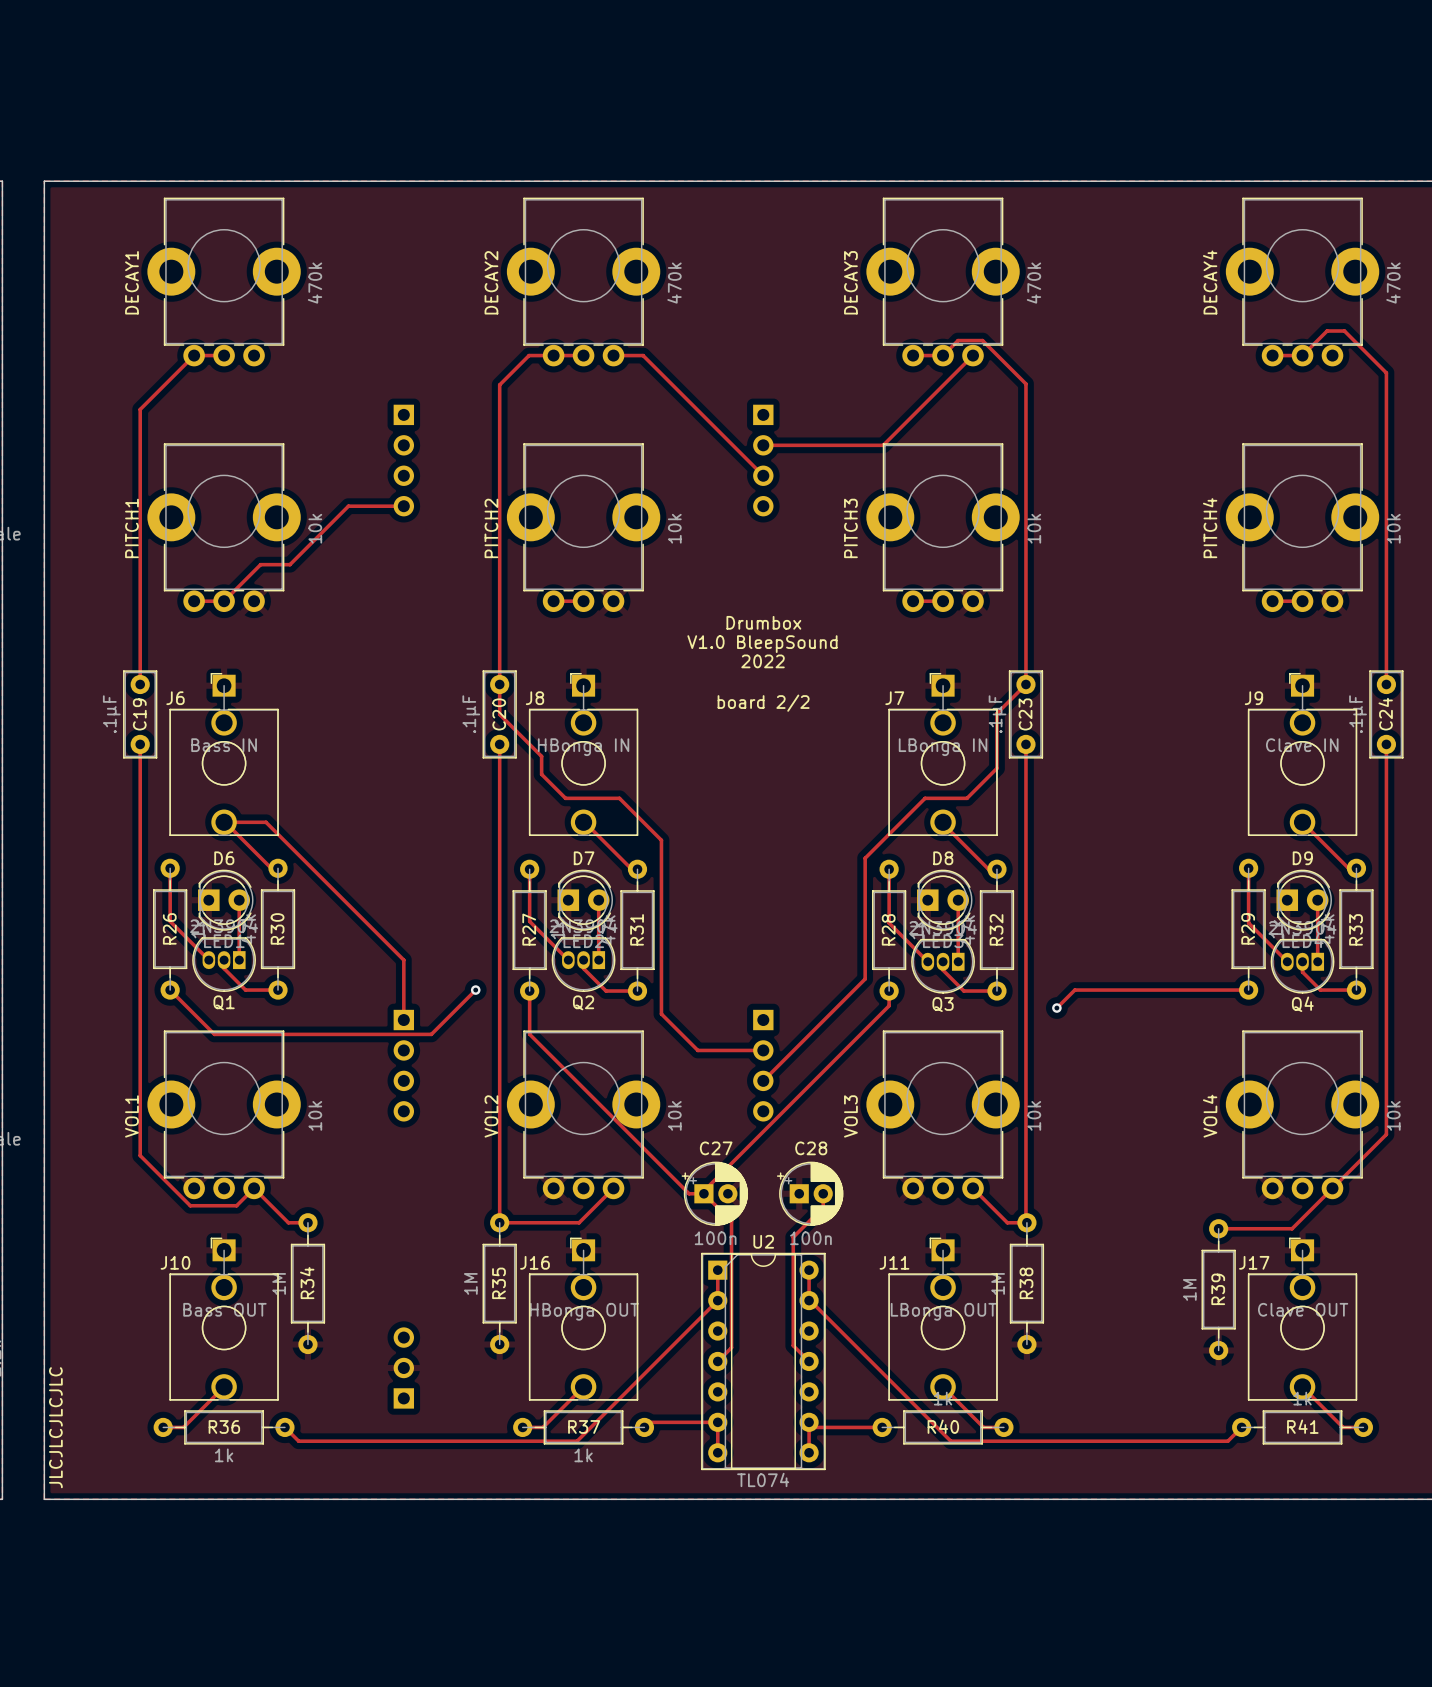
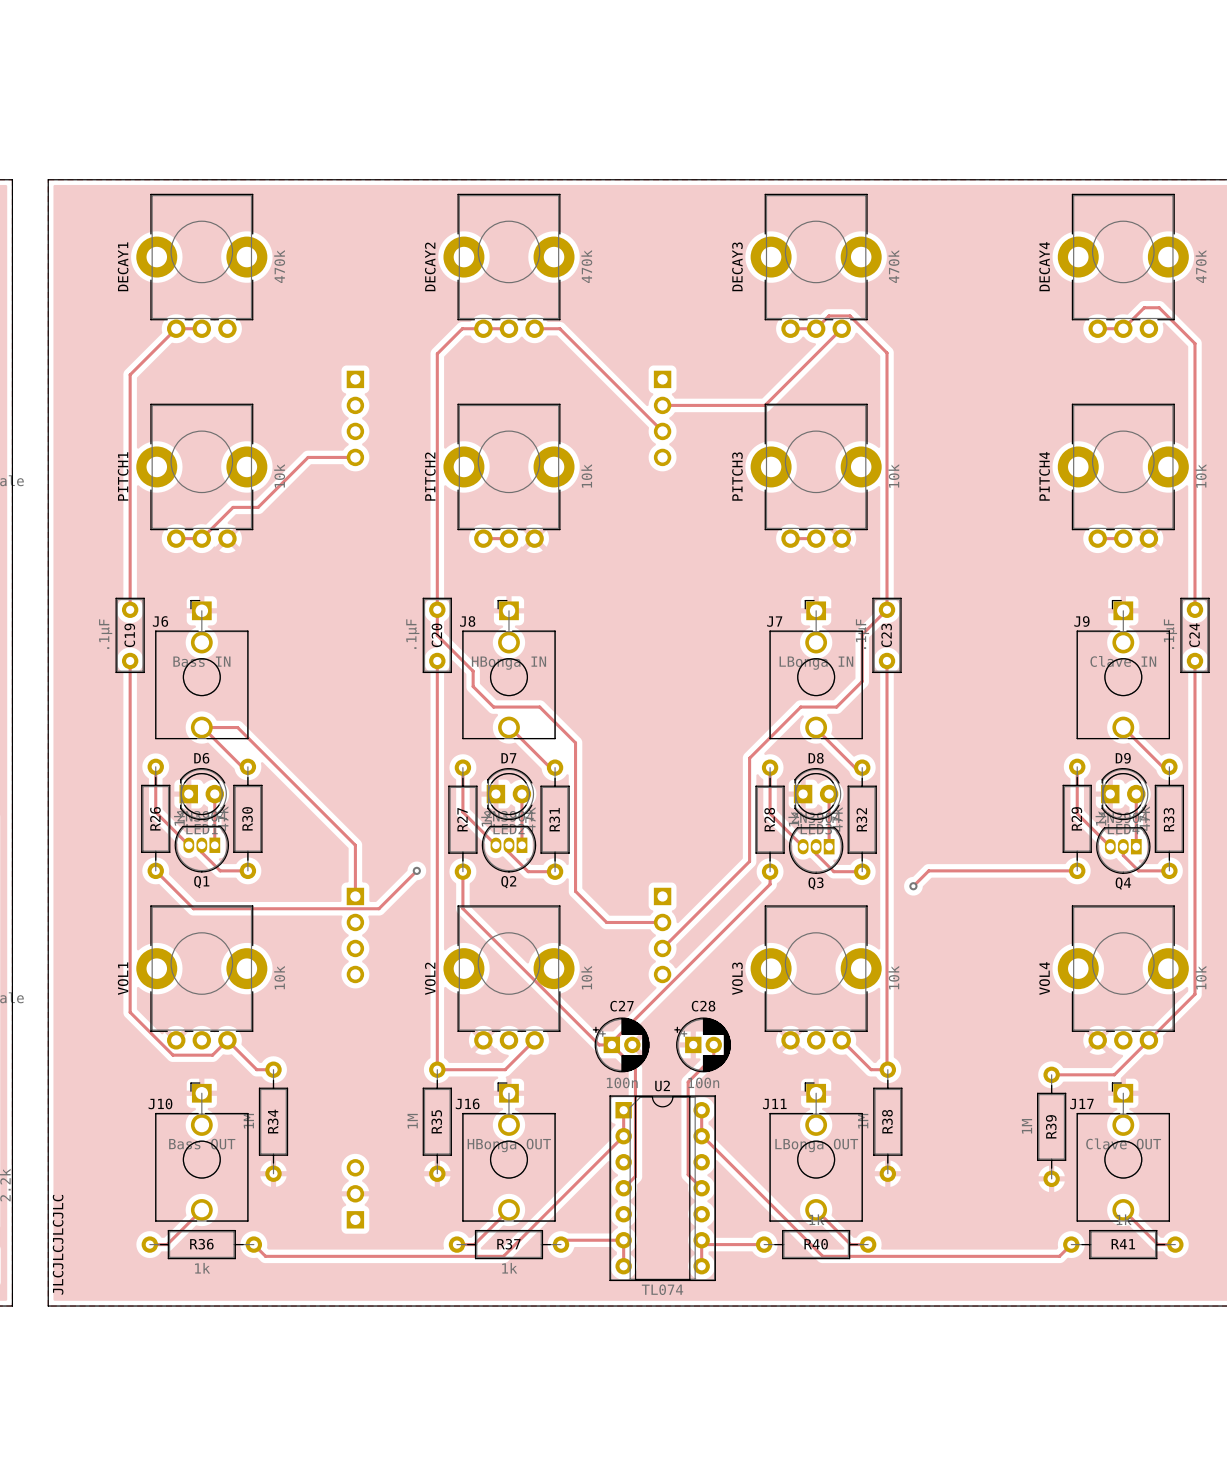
text: Drumbox (763, 622) -> none
text: V1.0 BleepSound (762, 644) -> none
text: 2022 (763, 661) -> none
text: board 2/2 (763, 703) -> none

